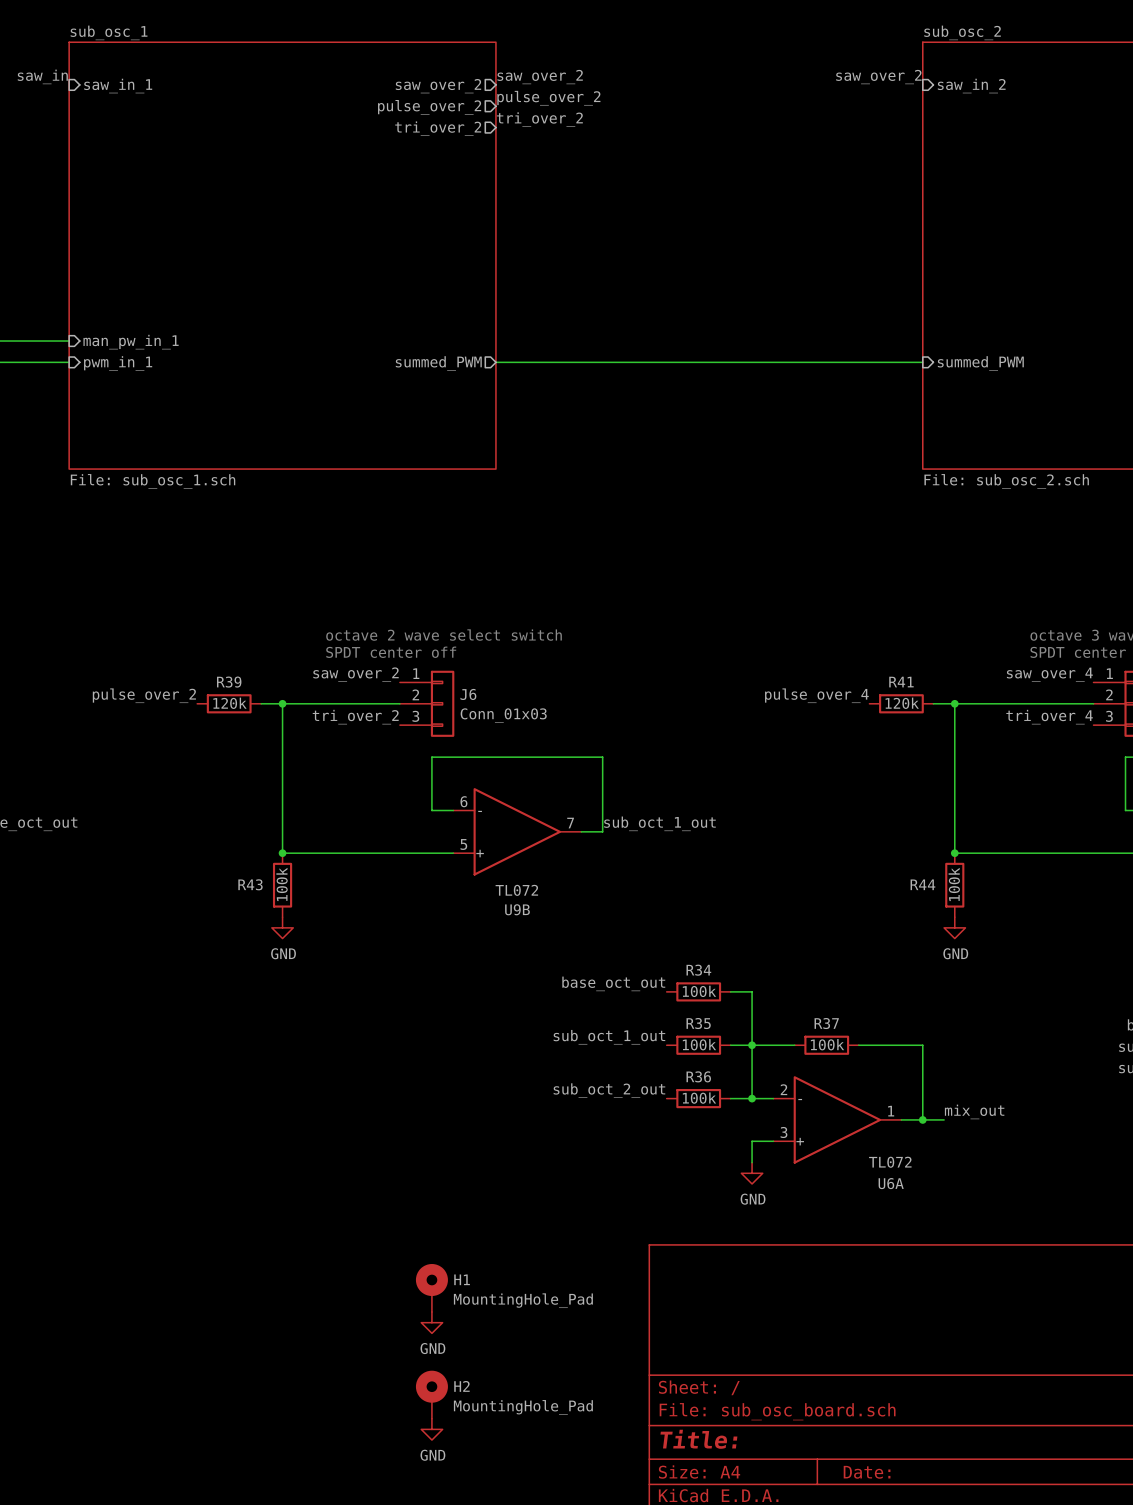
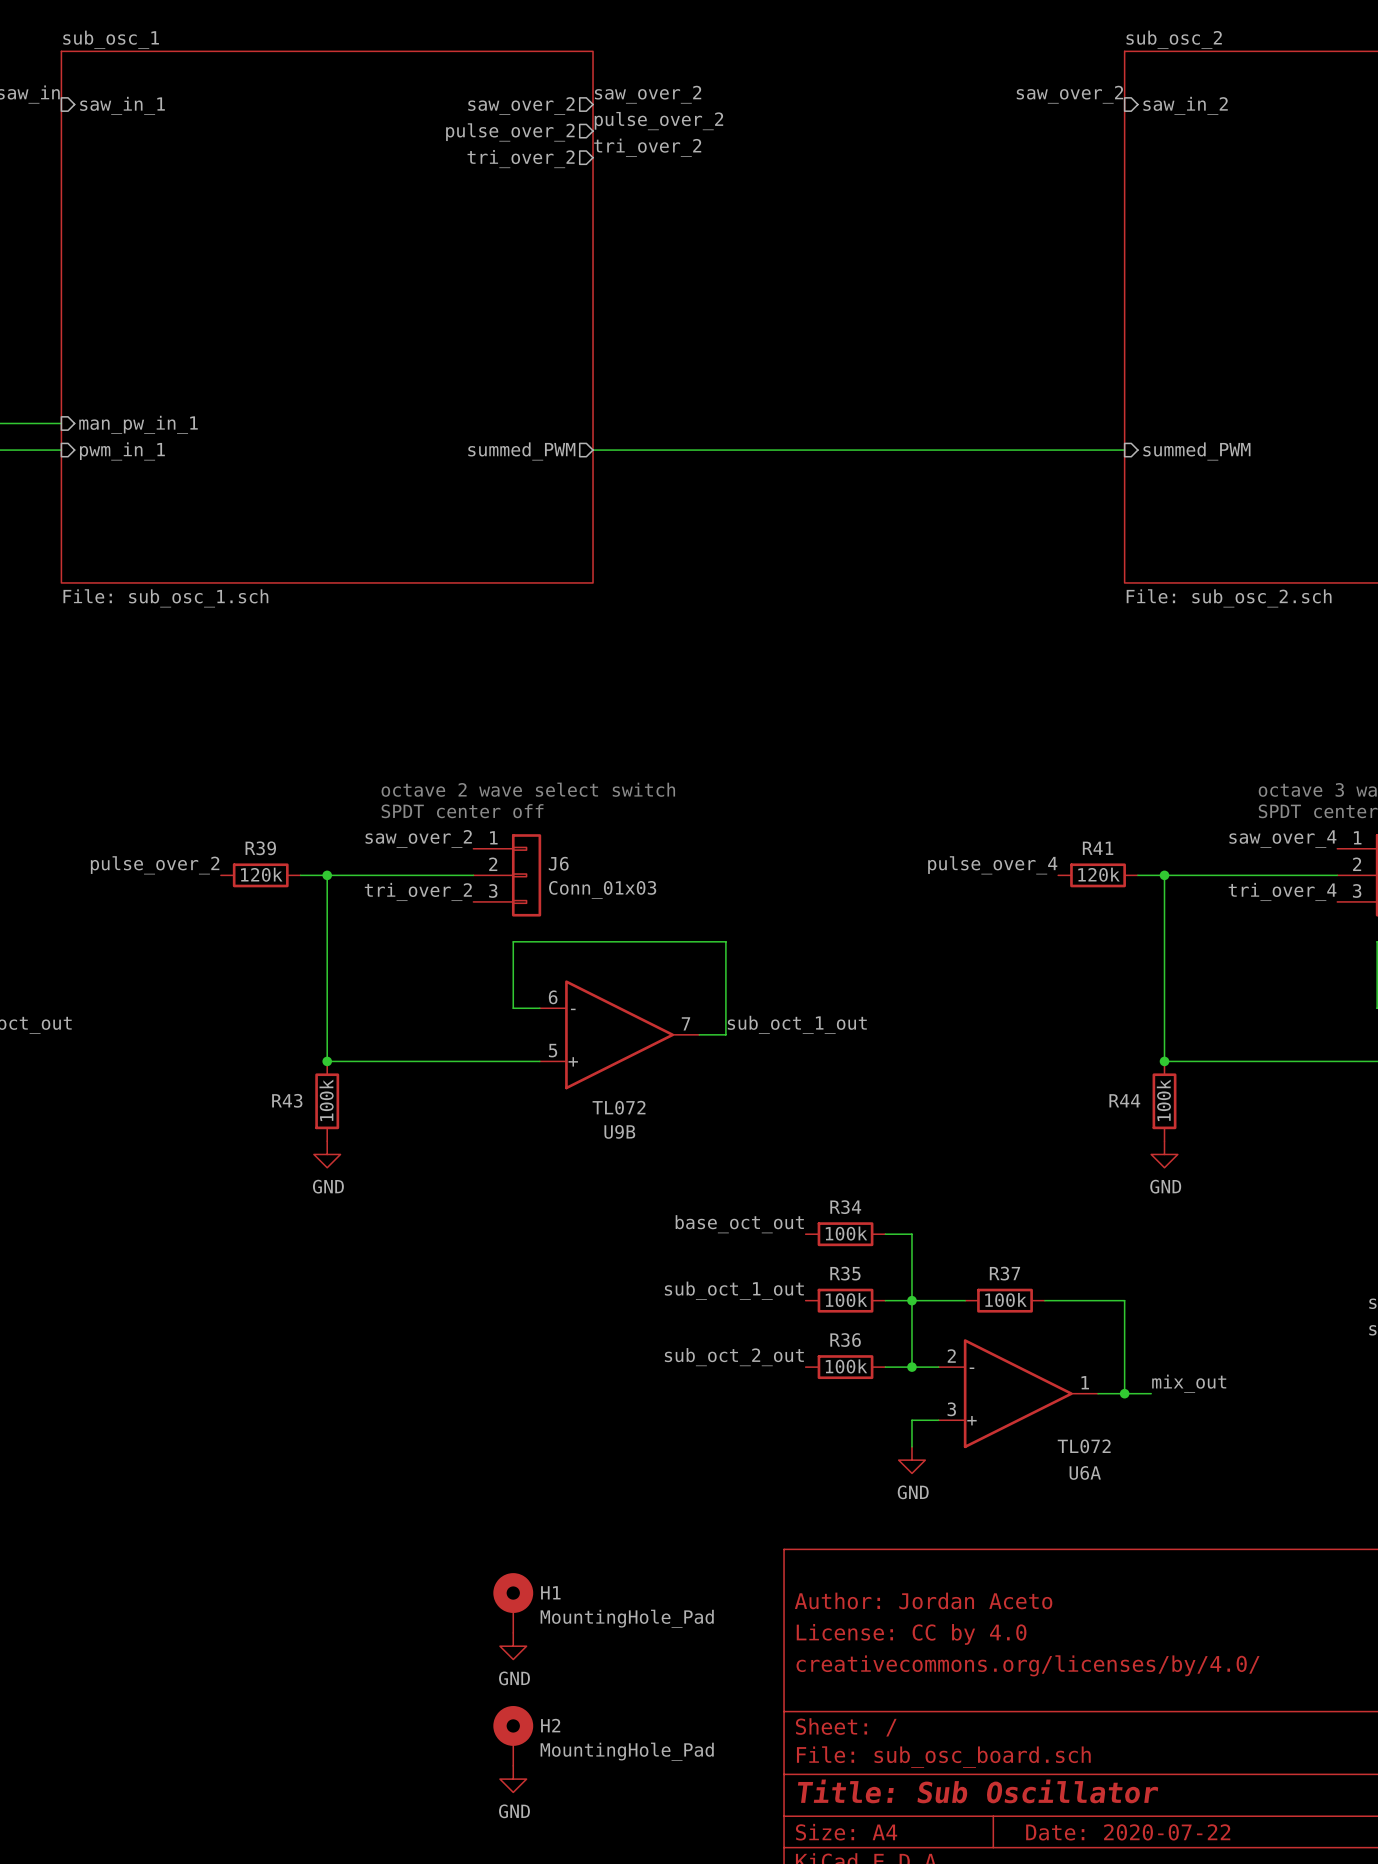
title block: none -> Author: Jordan Aceto (923, 1600)
title block: none -> License: CC by 4.0 (911, 1634)
title block: none -> creativecommons.org/licenses/by/4.0/ (1028, 1665)
title block: Title: (698, 1439) -> Title: Sub Oscillator (978, 1791)
title block: Date: (867, 1472) -> Date: 2020-07-22 (1128, 1832)

